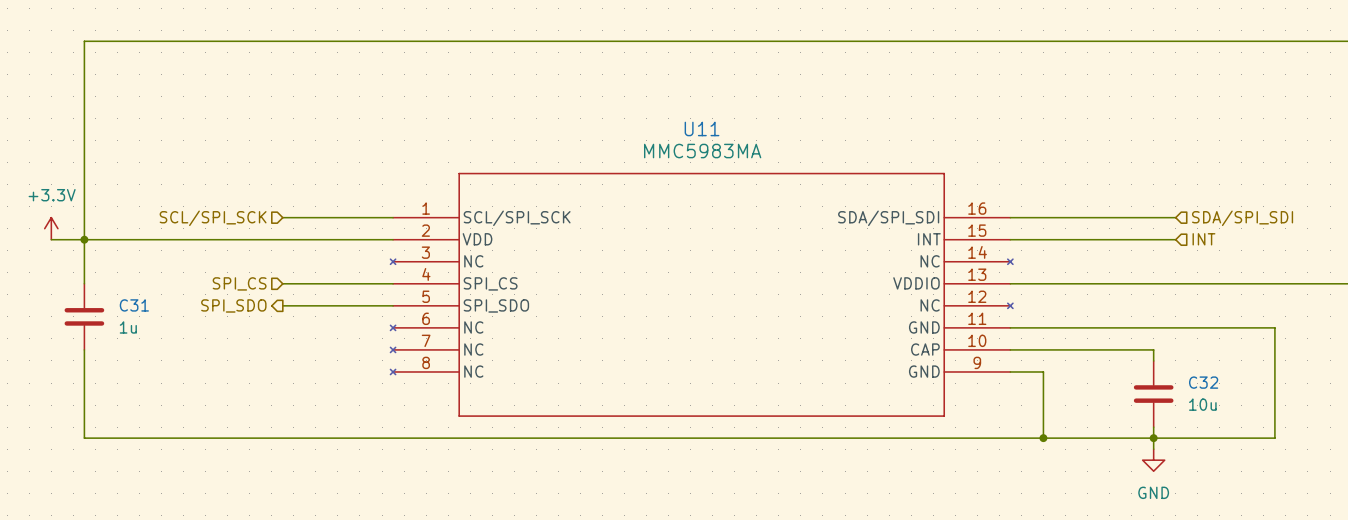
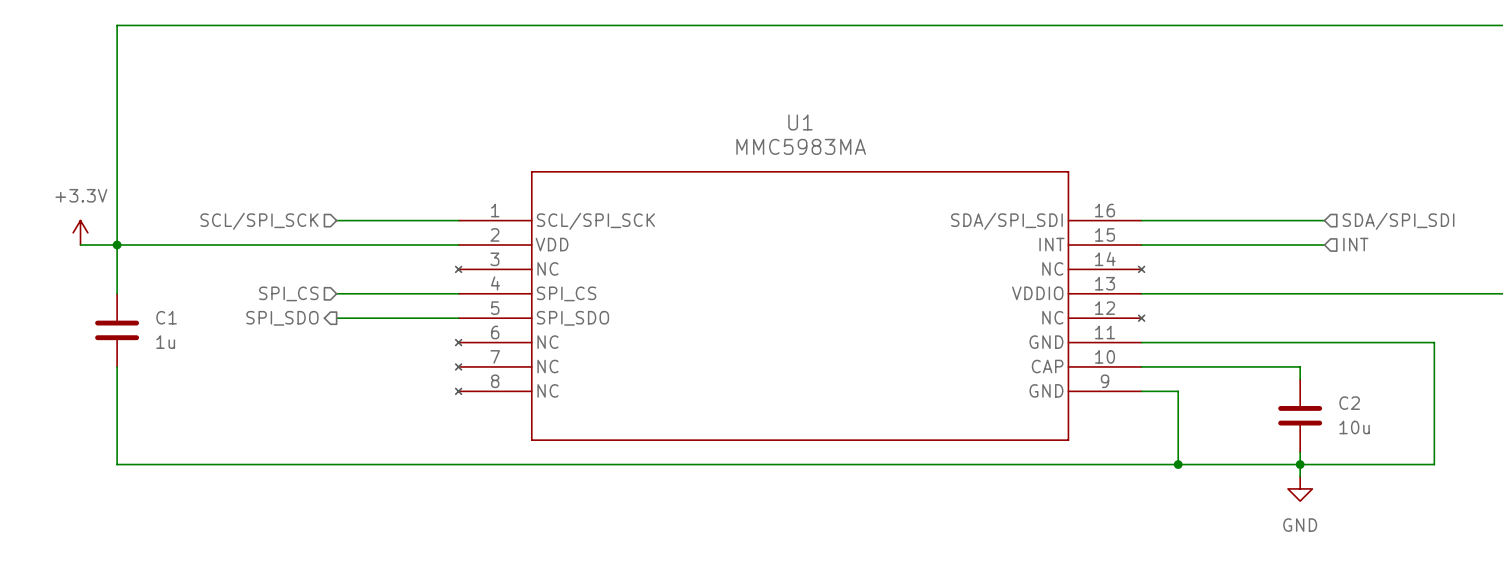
U11 name: U11 (702, 128) -> U1 (800, 122)
C31 name: C31 (134, 305) -> C1 (166, 317)
C32 name: C32 (1203, 382) -> C2 (1349, 403)

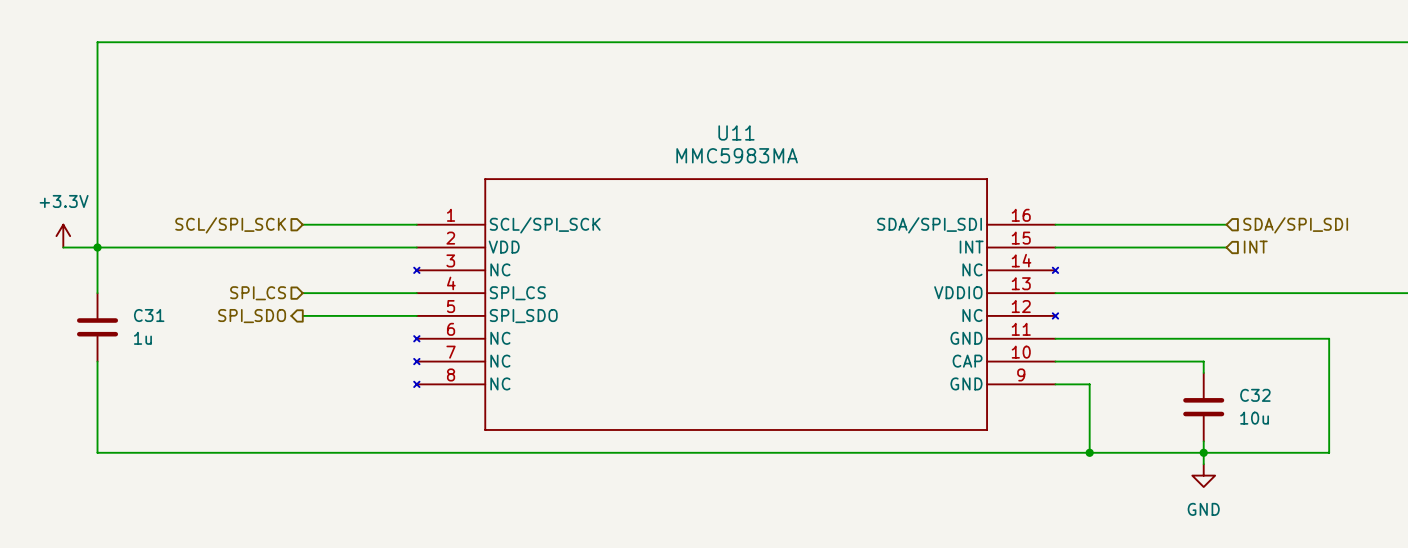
U1 name: U1 (800, 122) -> U11 (736, 132)
C1 name: C1 (166, 317) -> C31 (149, 315)
C2 name: C2 (1349, 403) -> C32 (1255, 395)

